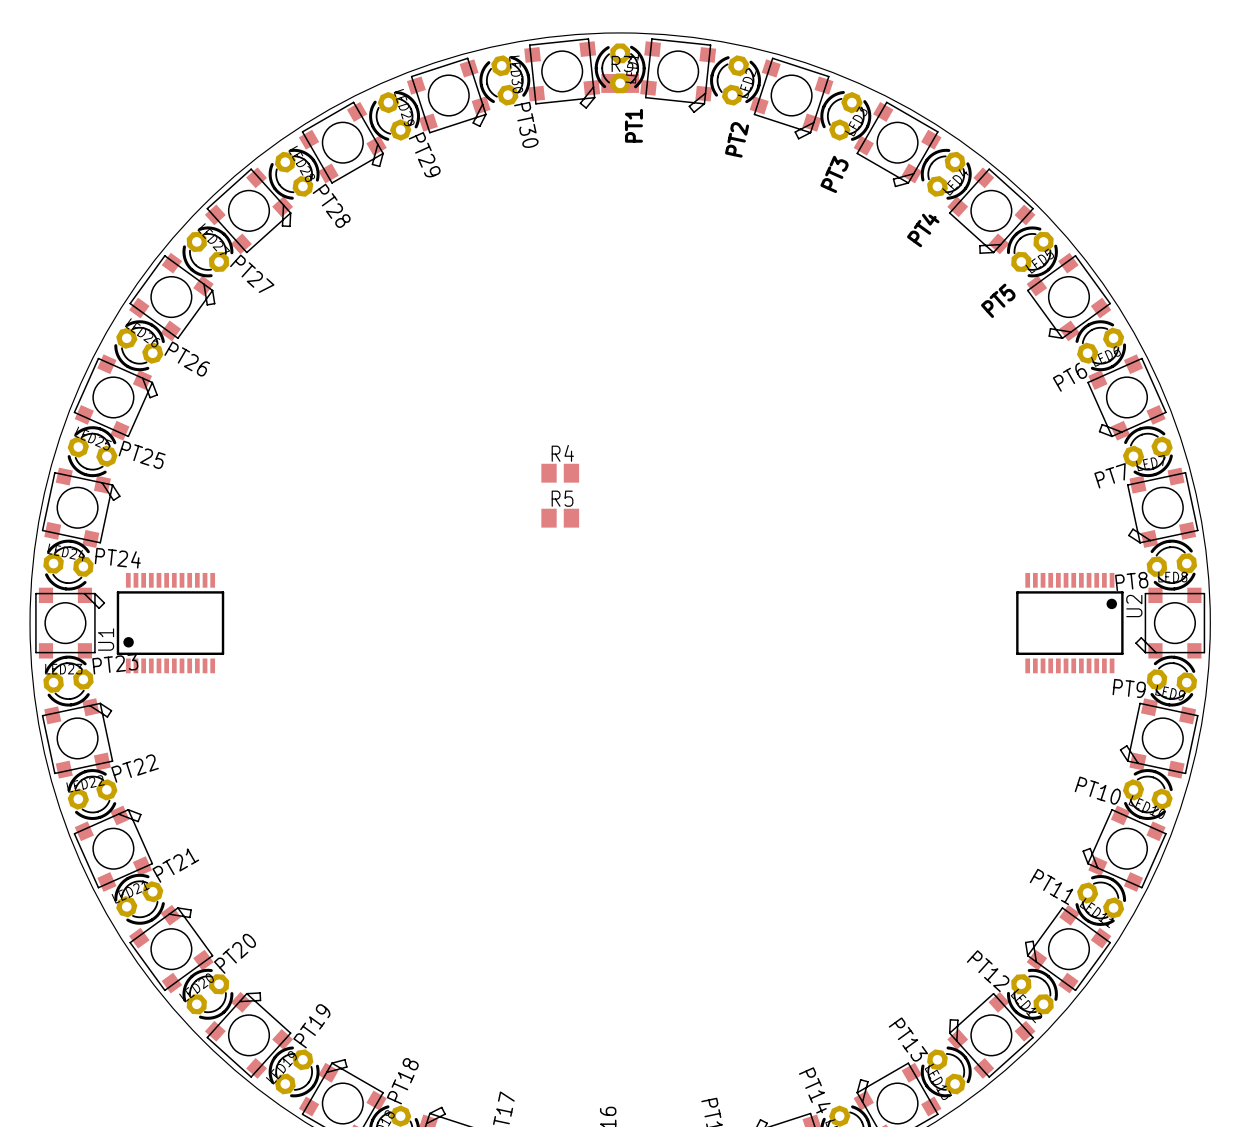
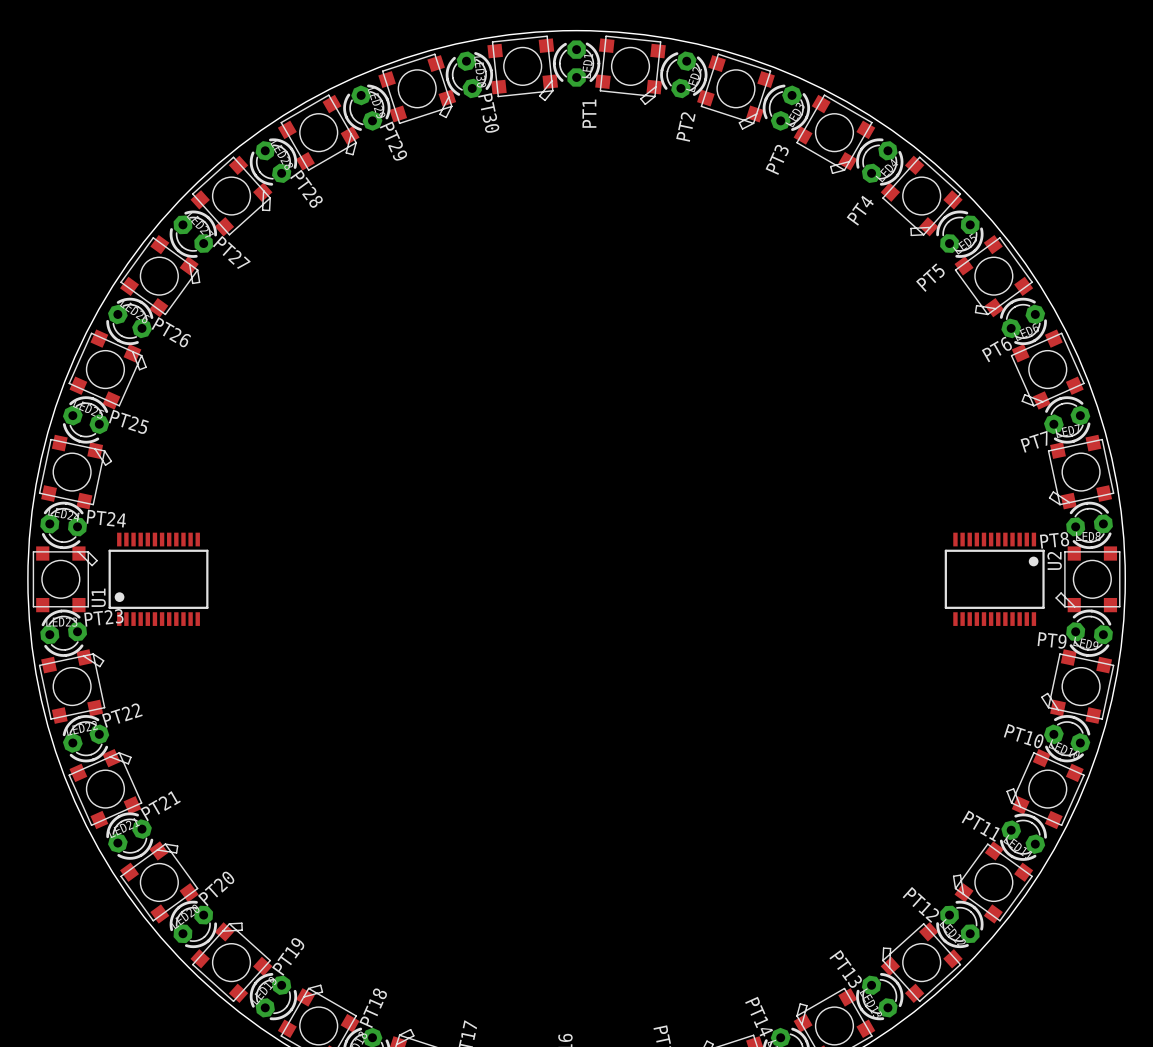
R3: (620, 83) -> none
R4: (560, 473) -> none
R5: (560, 518) -> none

